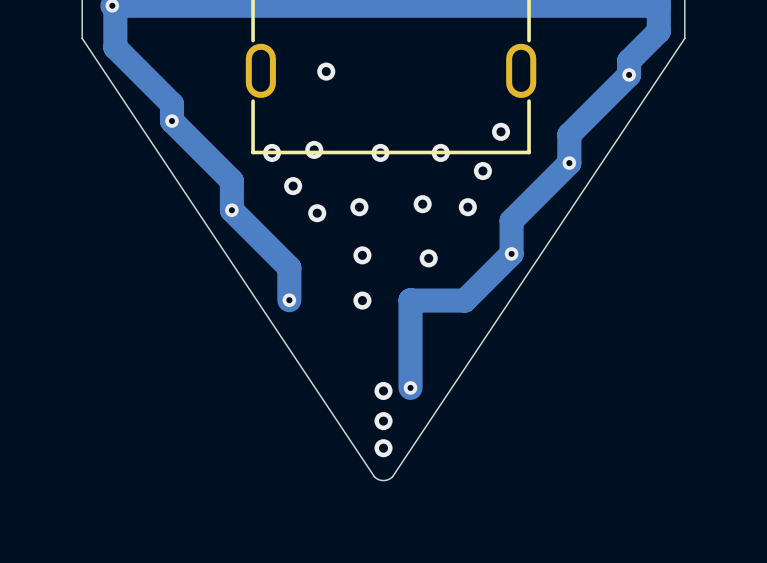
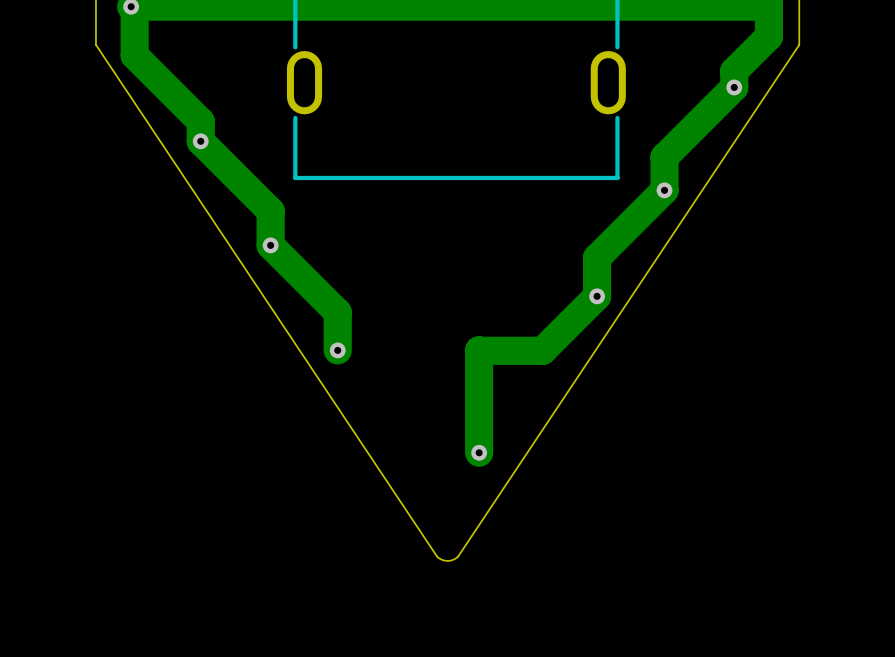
via: (326, 71) -> none
via: (501, 131) -> none
via: (314, 149) -> none
via: (272, 152) -> none
via: (380, 152) -> none
via: (440, 152) -> none
via: (482, 171) -> none
via: (293, 186) -> none
via: (422, 204) -> none
via: (359, 207) -> none
via: (467, 207) -> none
via: (317, 213) -> none
via: (362, 255) -> none
via: (428, 258) -> none
via: (362, 300) -> none
via: (383, 390) -> none
via: (383, 421) -> none
via: (383, 448) -> none

